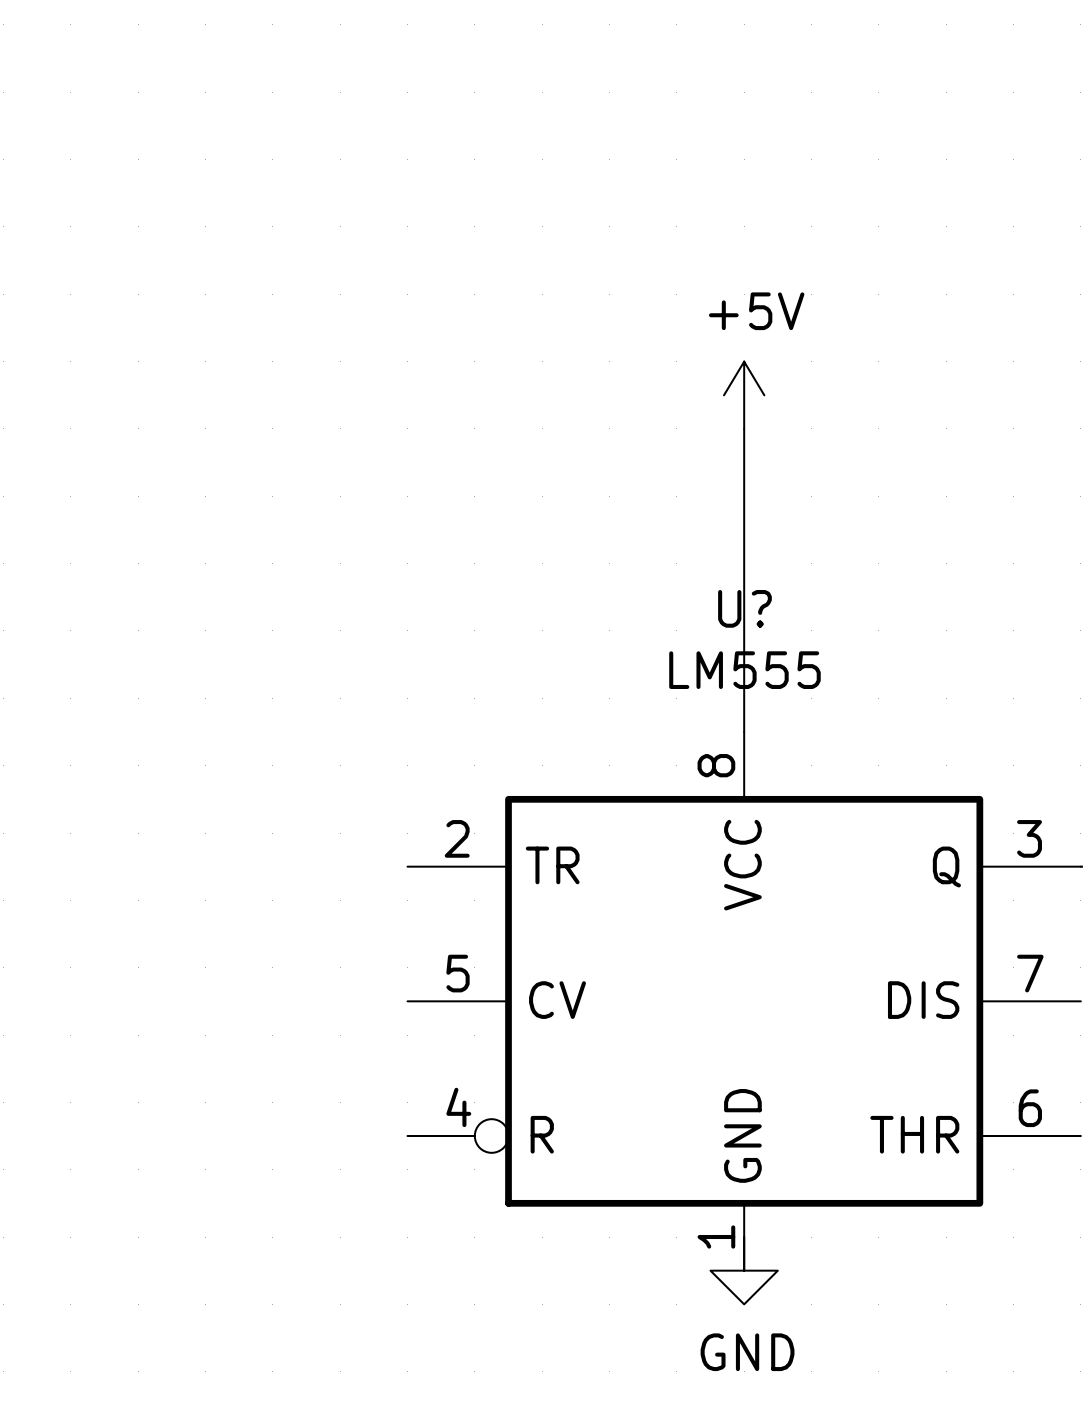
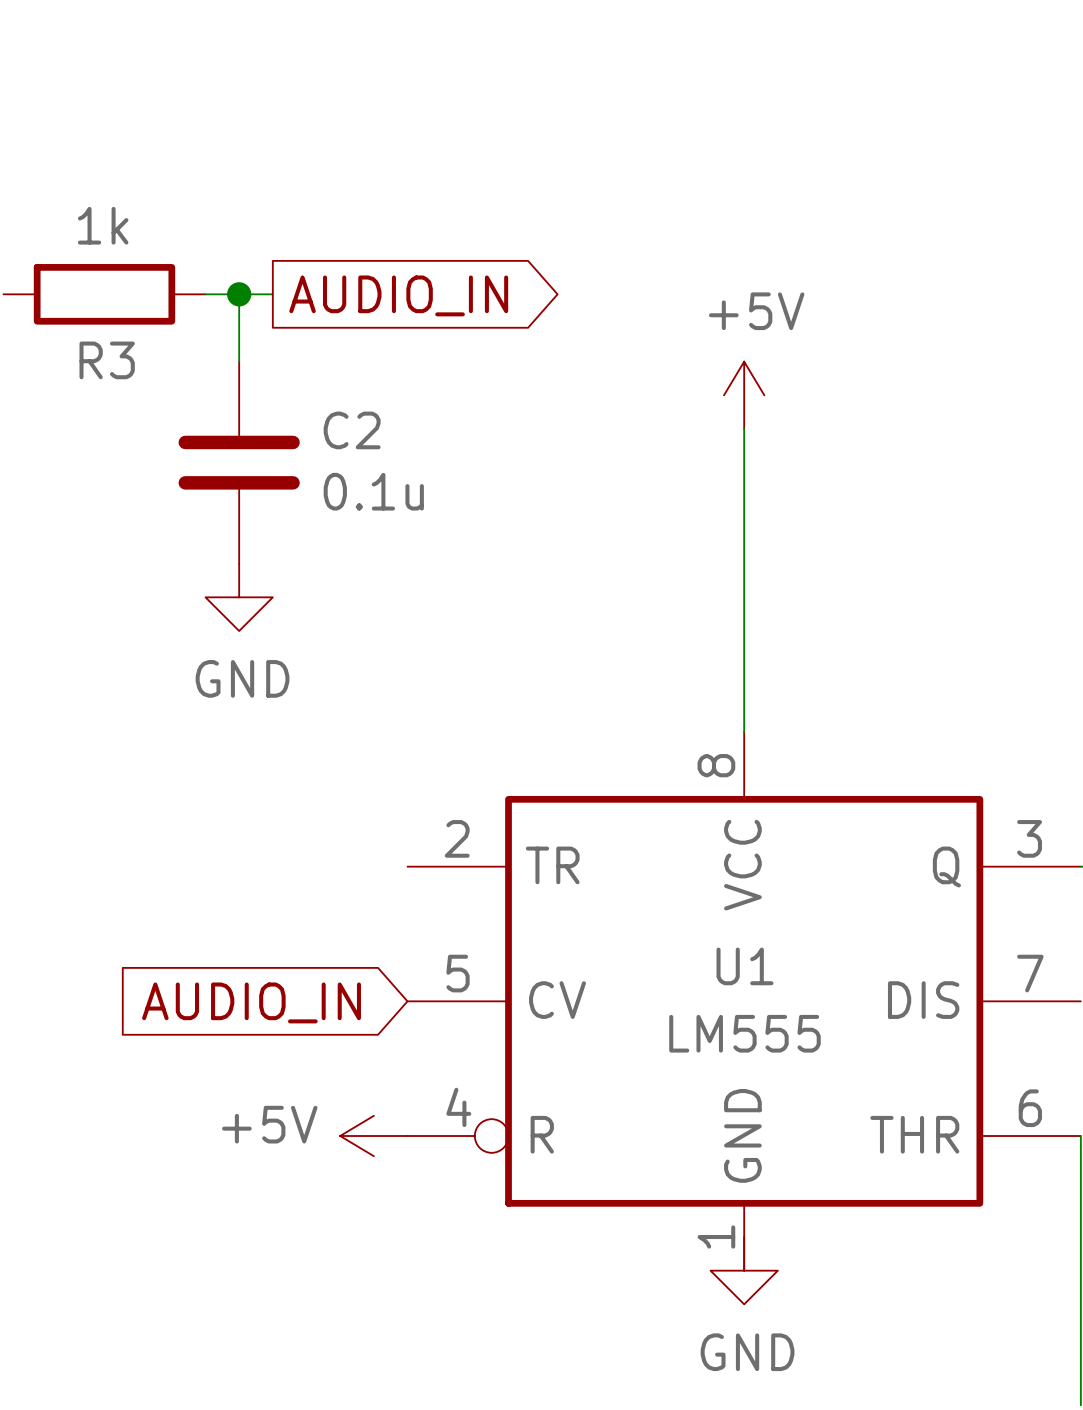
R3: none -> 1k (104, 294)
wire: none -> (205, 294) (272, 294)
wire: none -> (239, 294) (239, 361)
junction: none -> (239, 294)
global label: none -> AUDIO_IN (398, 295)
C2: none -> 0.1u (239, 462)
power symbol: none -> GND (239, 597)
U? name: U? (744, 608) -> U1 (744, 966)
U? value position: LM555 (744, 670) -> LM555 (744, 1033)
global label: none -> AUDIO_IN (251, 1002)
power symbol: none -> +5V (373, 1136)
wire: none -> (1080, 1136) (1080, 1405)

